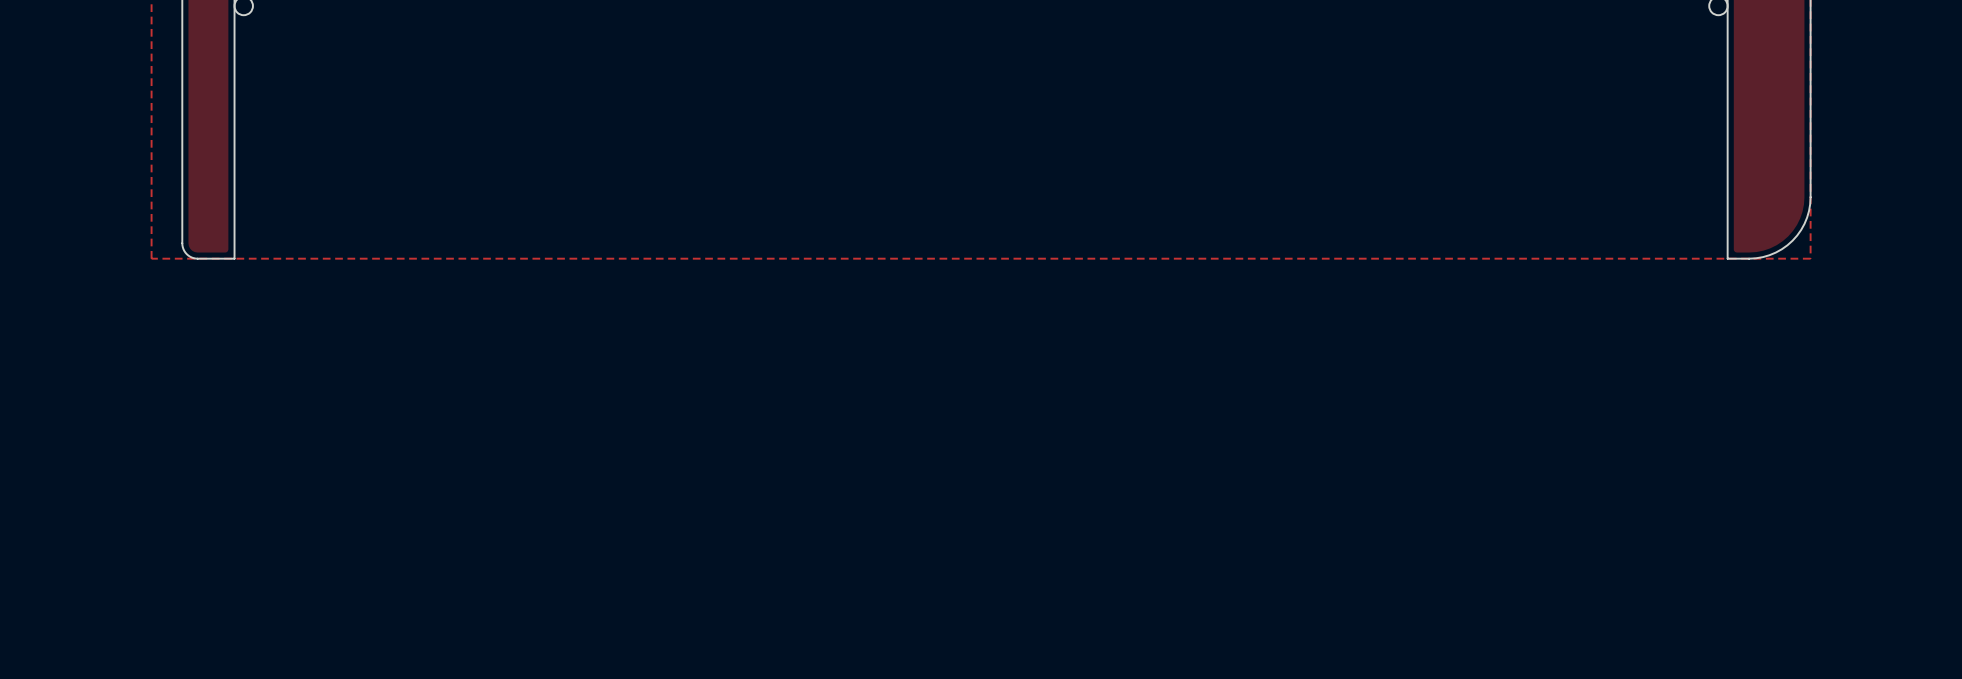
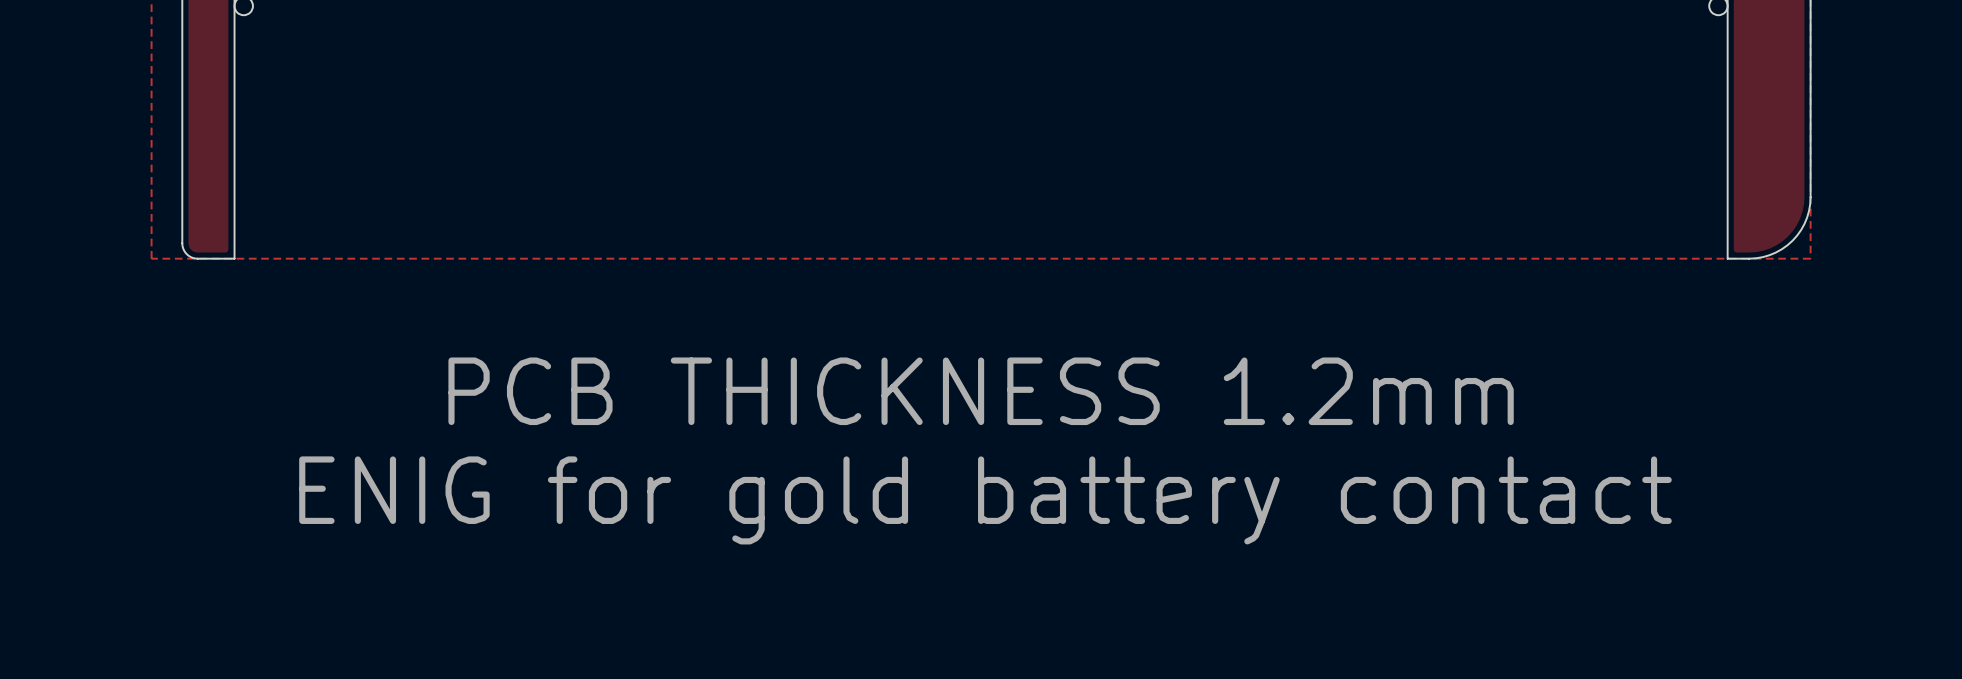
text: none -> PCB THICKNESS 1.2mm (981, 391)
text: none -> ENIG for gold battery contact (985, 500)

